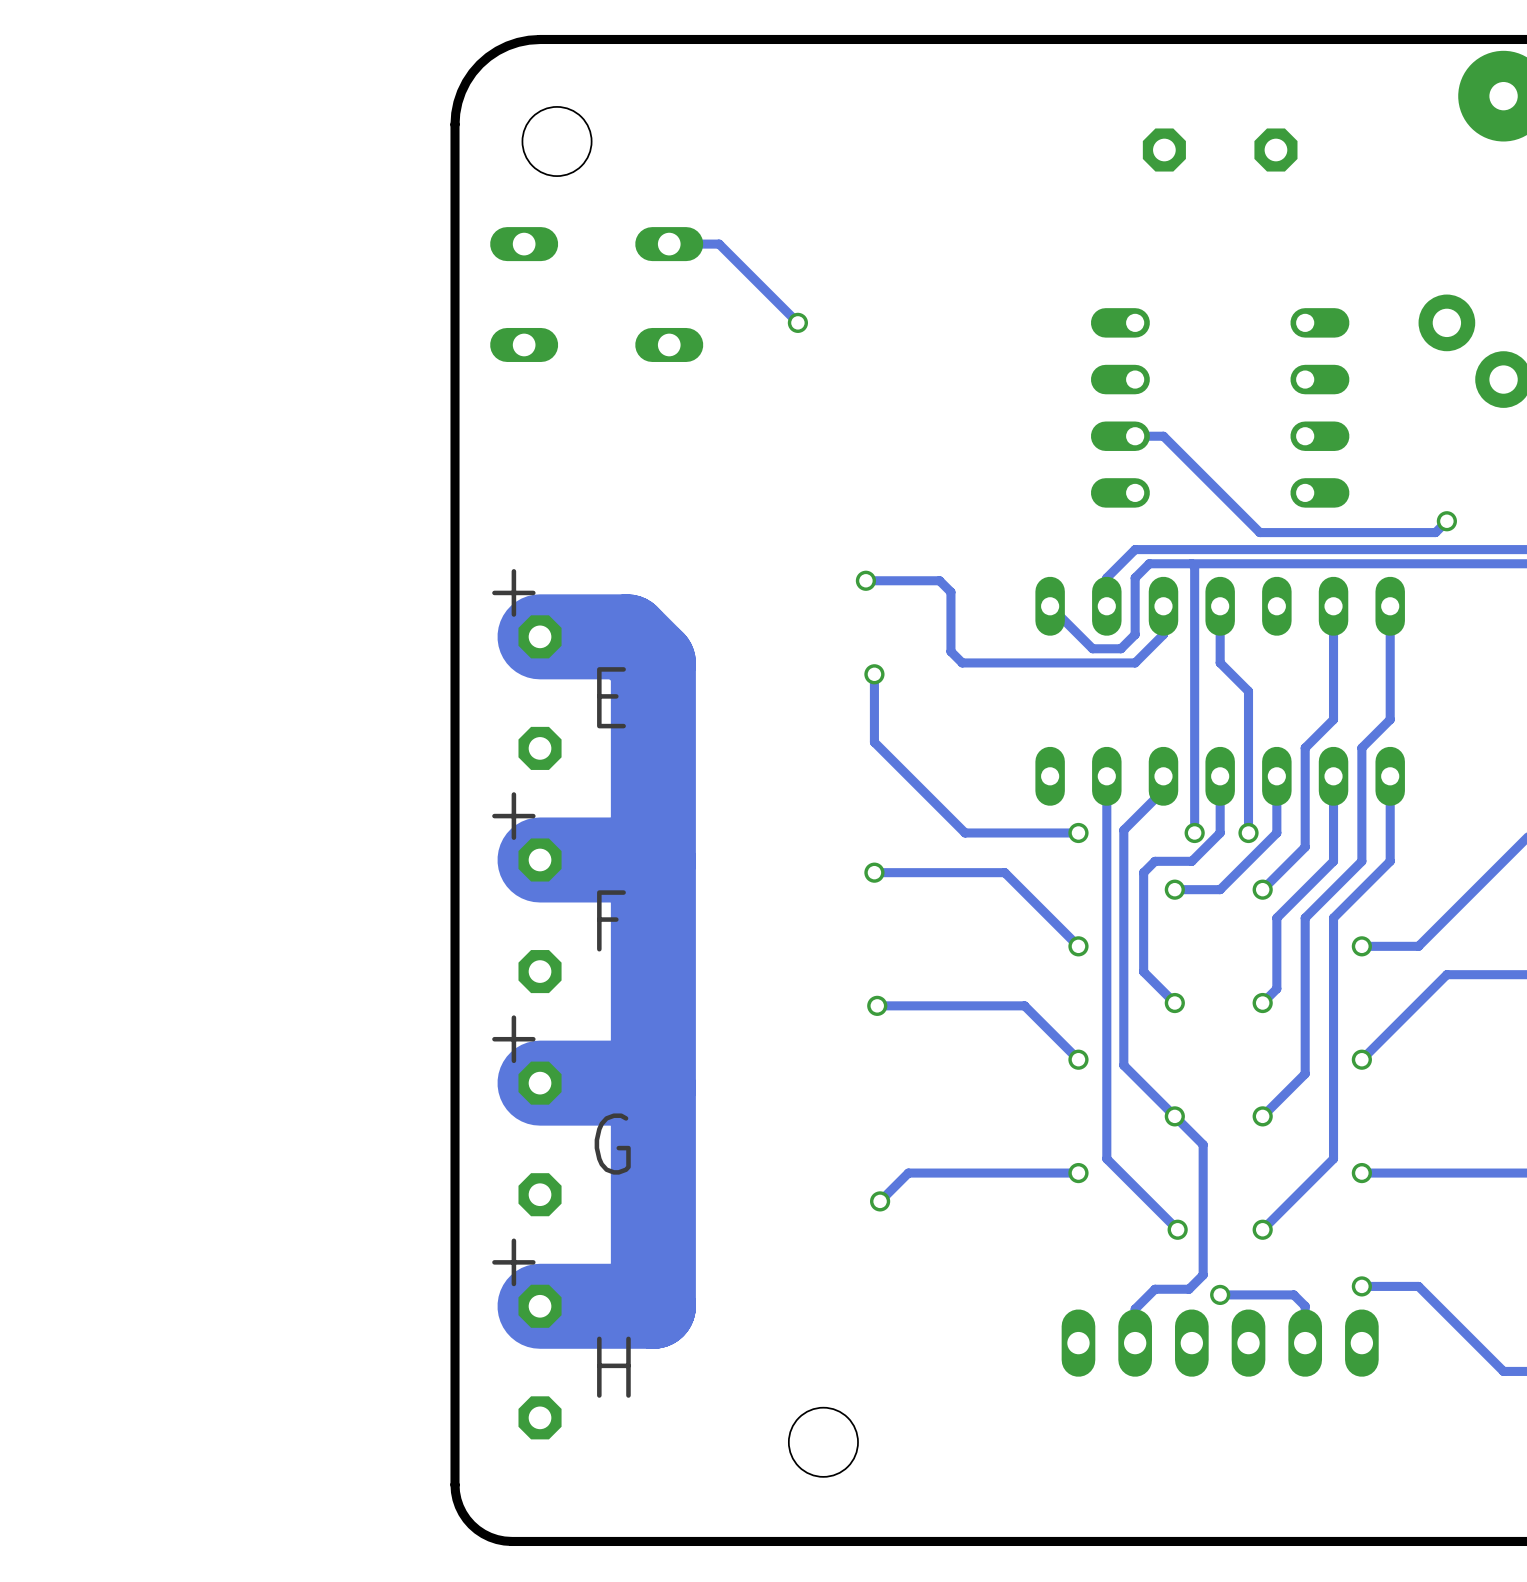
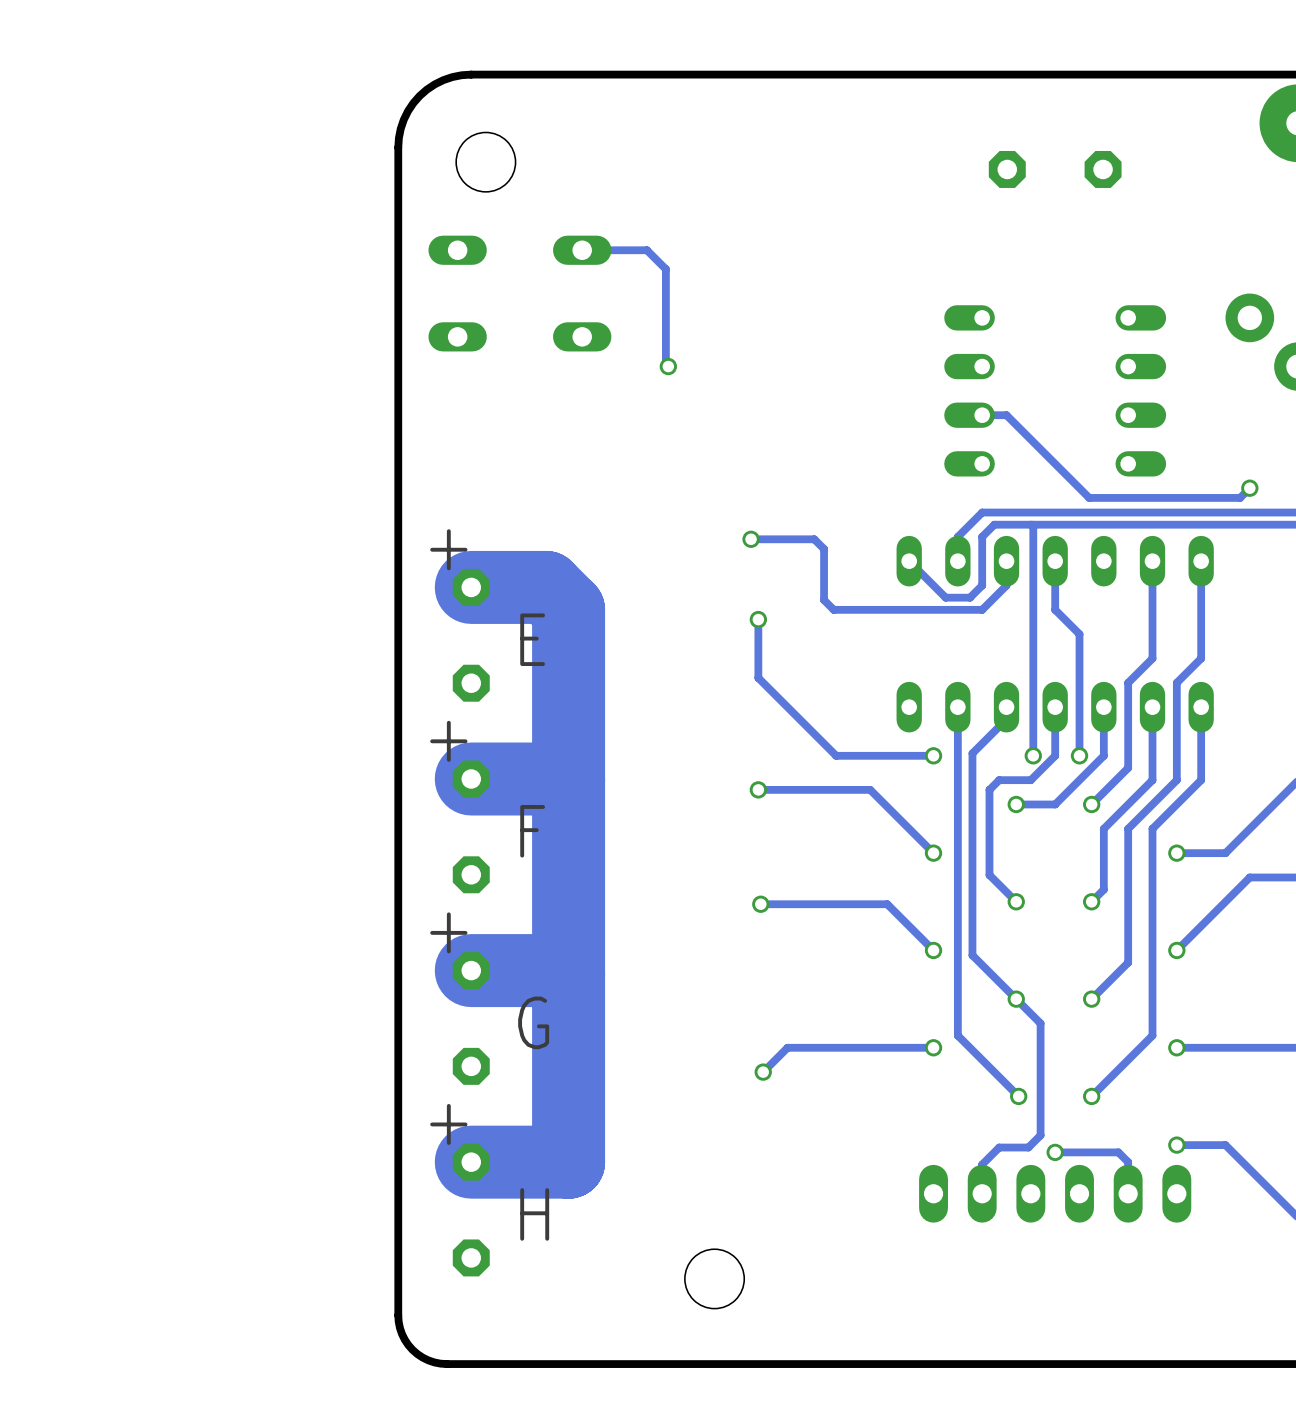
track: (719, 244) (797, 322) -> (625, 250) (646, 250) (665, 269) (665, 364) (668, 366)
via position: (797, 322) -> (668, 366)

